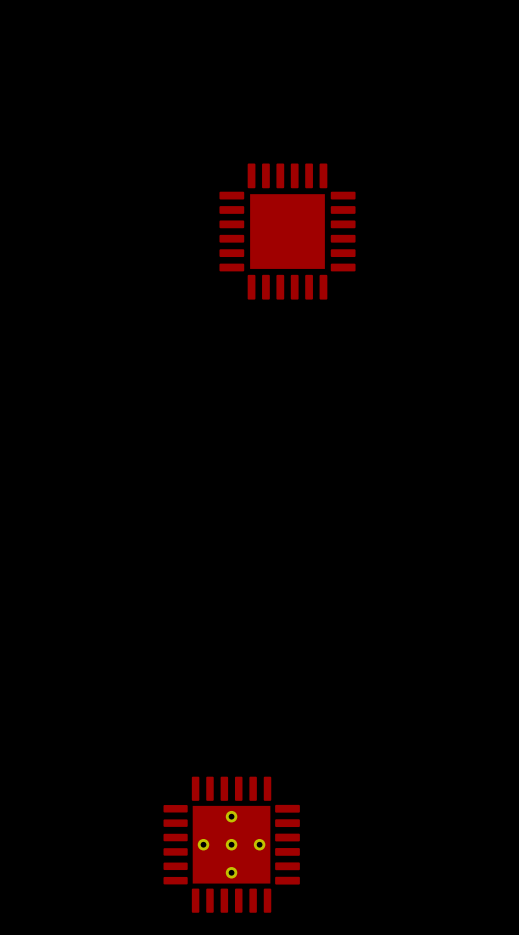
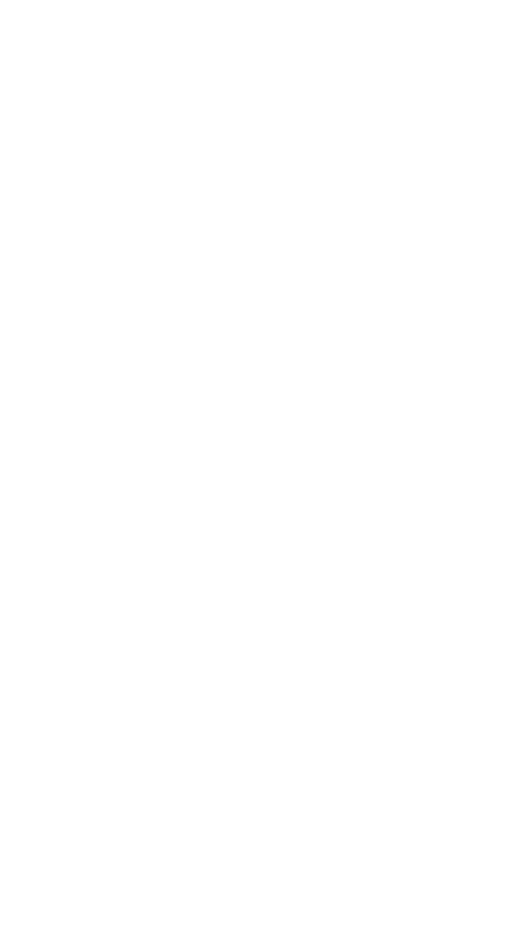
part: (287, 231) -> none
part: (231, 844) -> none

